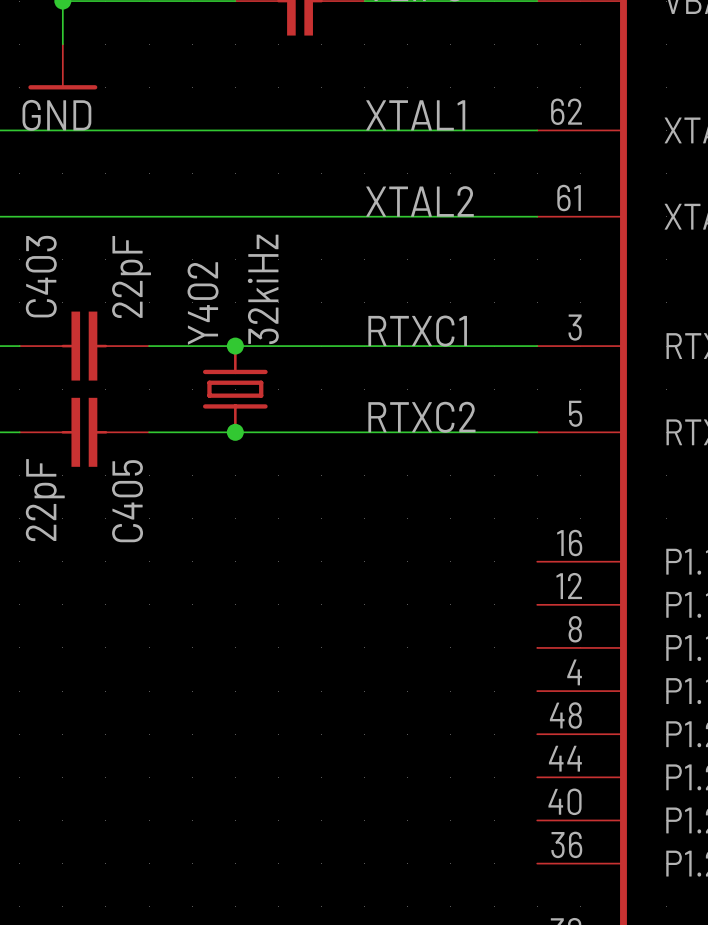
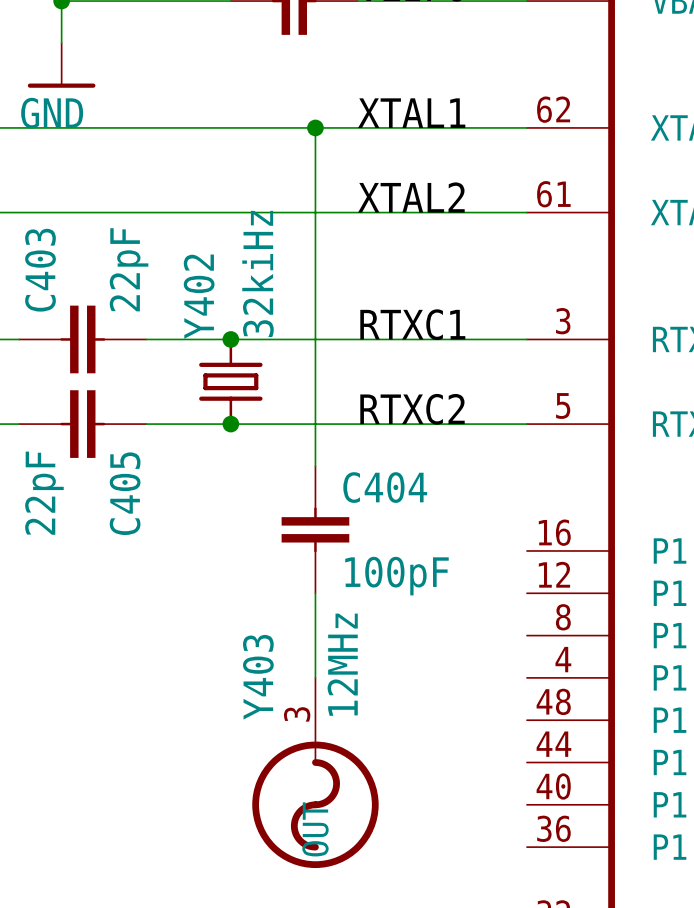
wire: none -> (315, 127) (315, 466)
junction: none -> (315, 127)
C404: none -> 100pF (315, 529)
wire: none -> (315, 593) (315, 677)
Y403: none -> 12MHz (315, 772)

